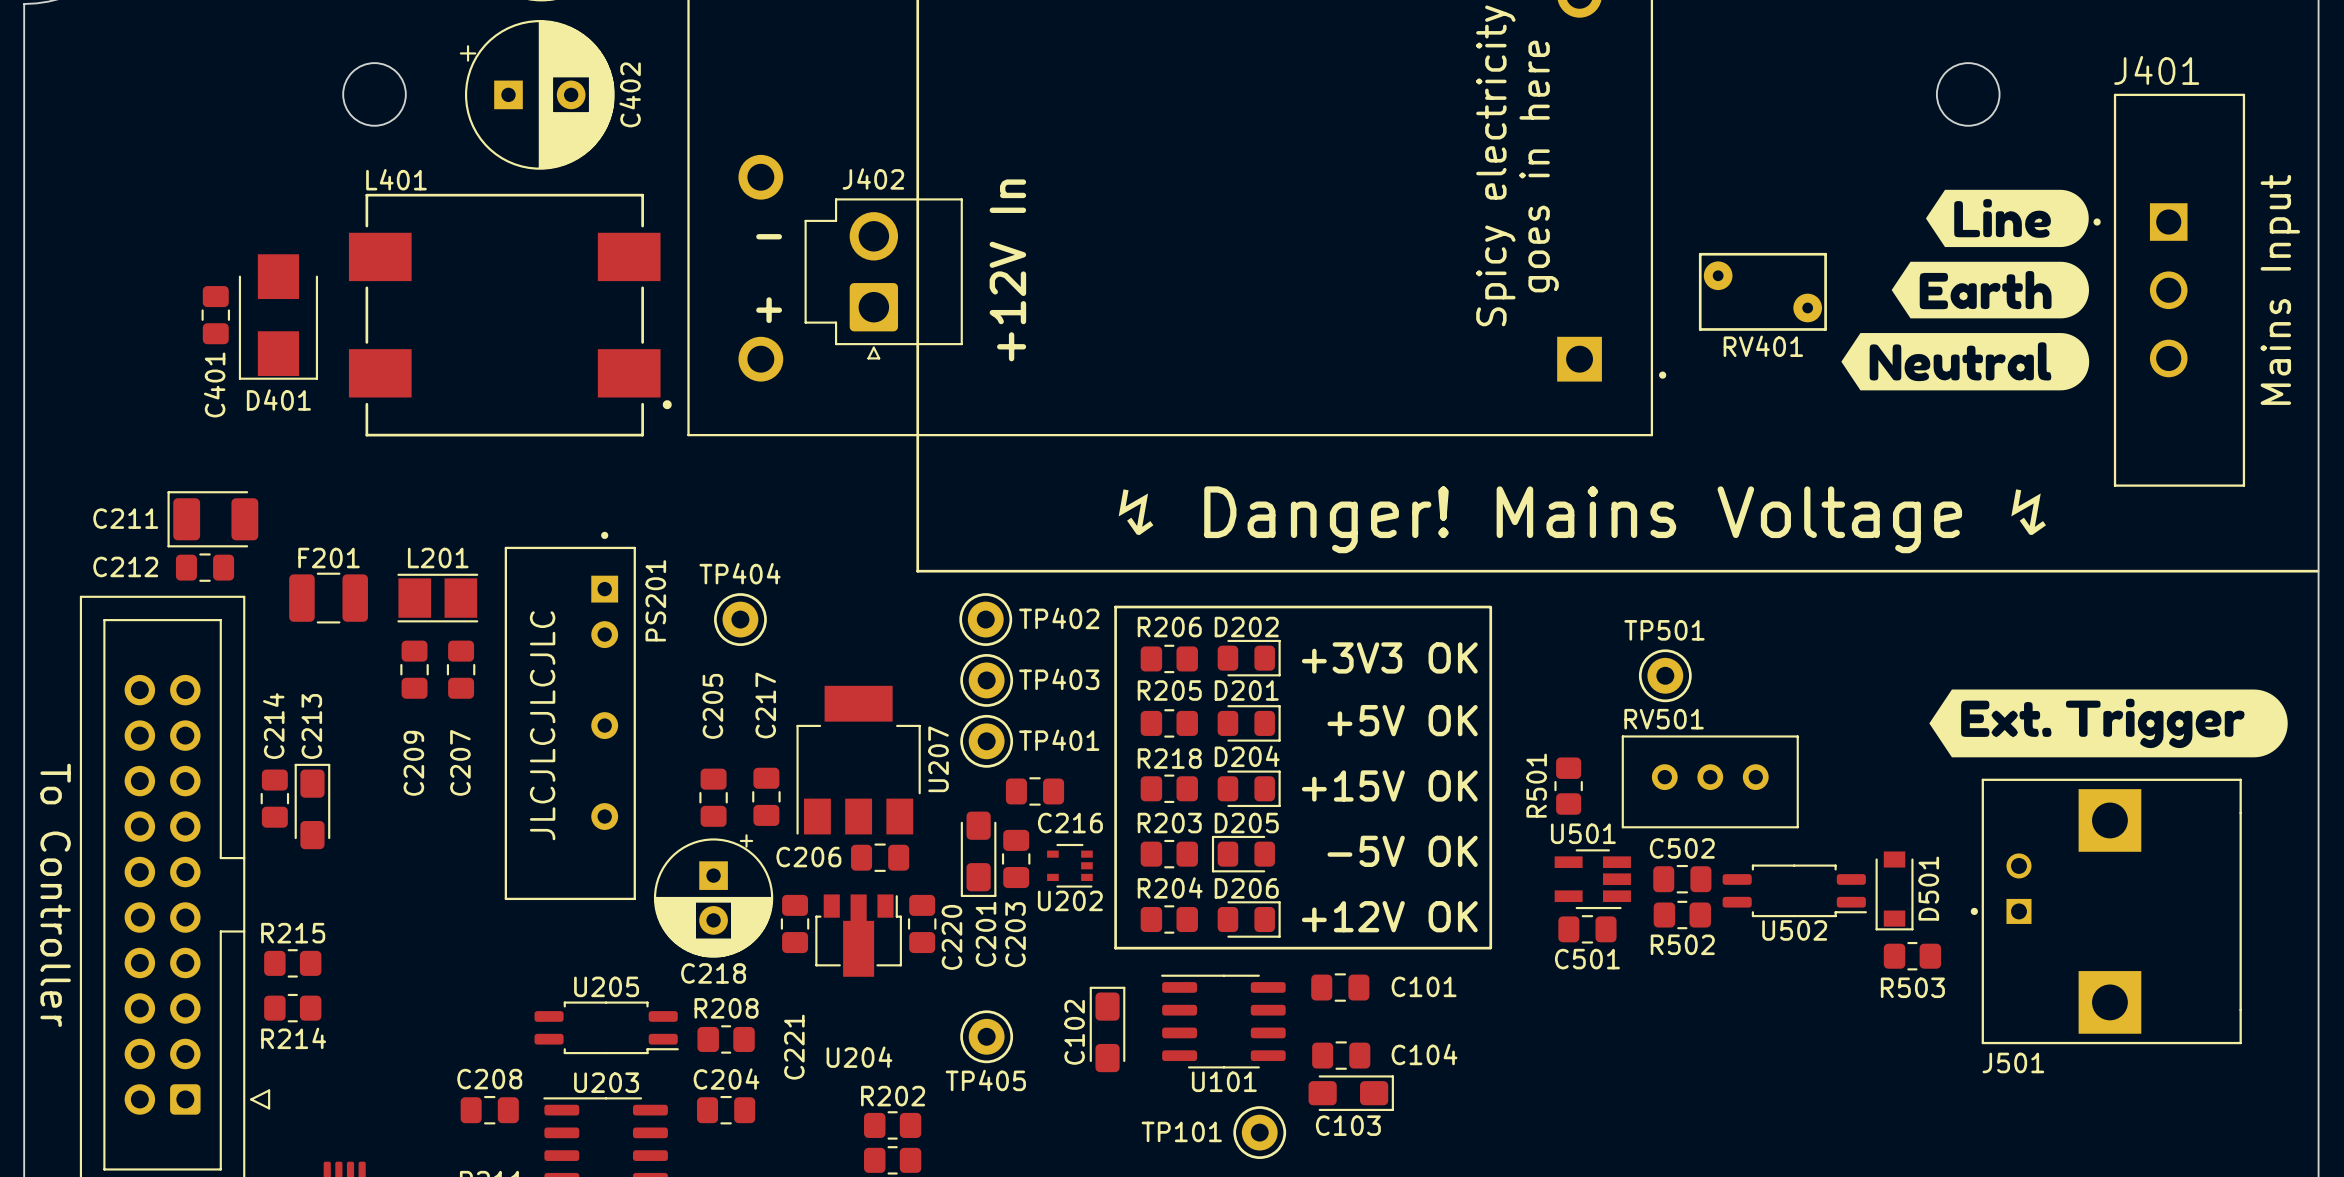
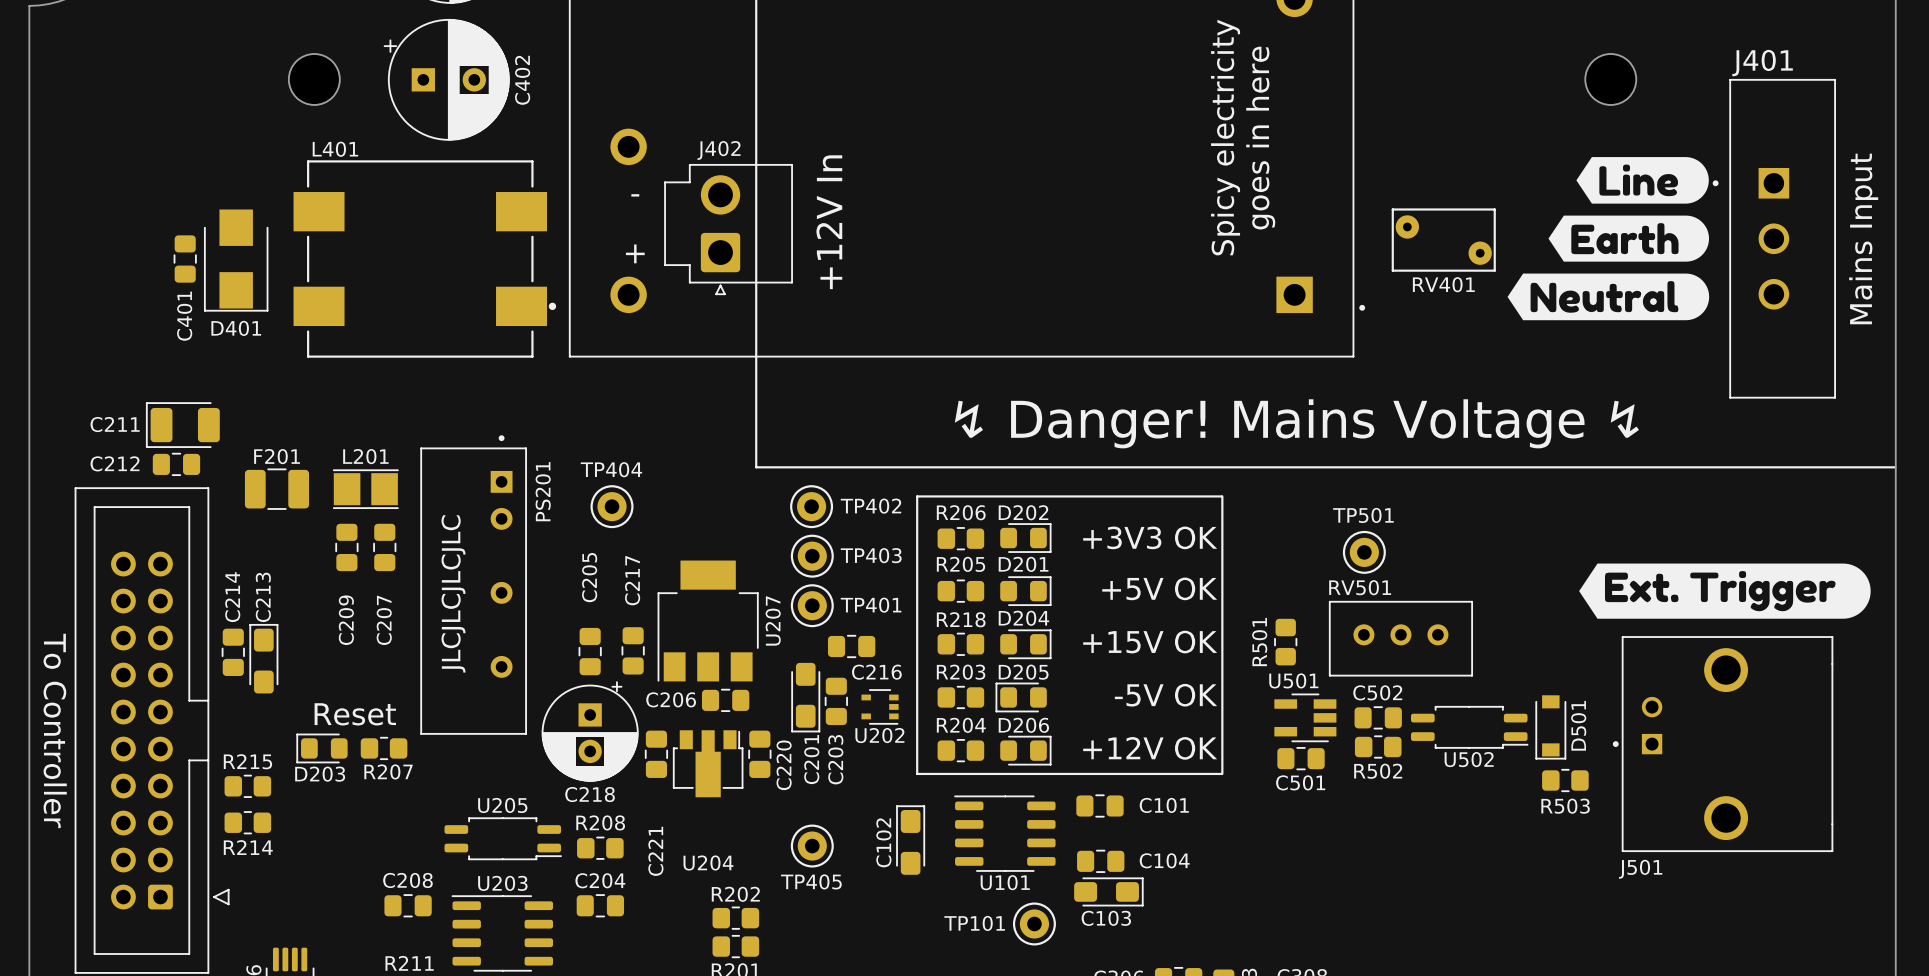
L401 footprint: [348, 193, 672, 437] -> [293, 160, 557, 358]
J501 footprint: [1970, 778, 2242, 1045] -> [1612, 636, 1834, 853]
text: none -> Reset (355, 714)
D203: none -> (321, 748)
R207: none -> (384, 748)

